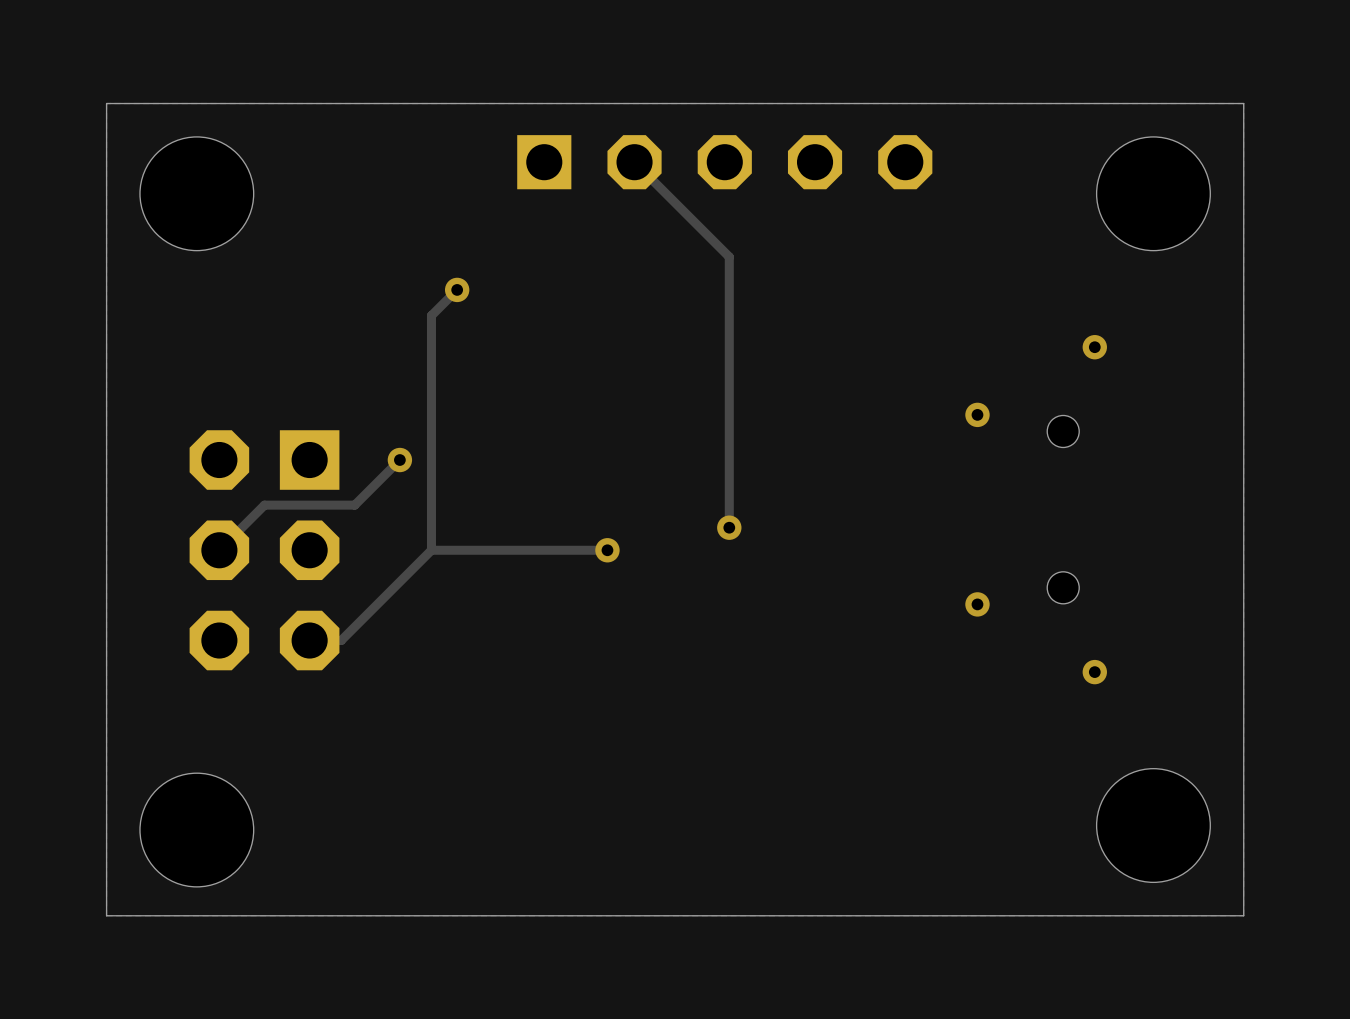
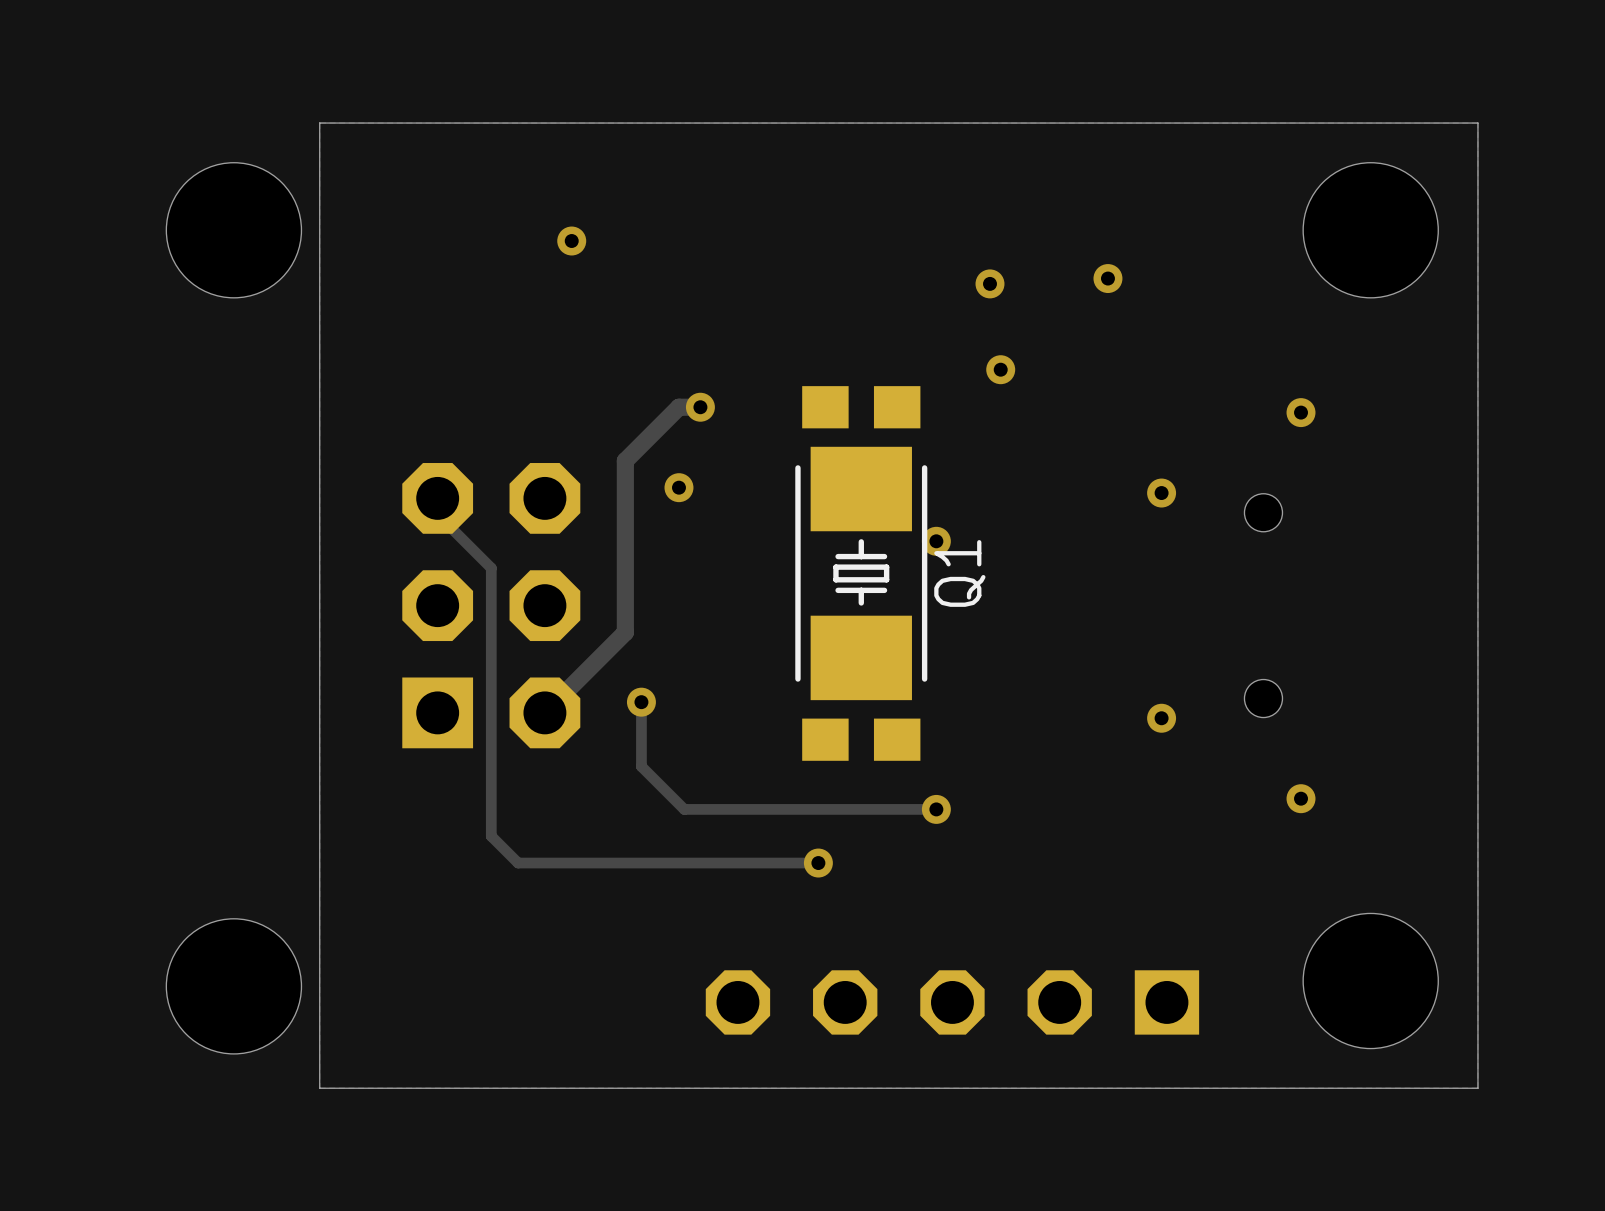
board edge: (269, 103) (106, 103) (106, 915) (269, 915) -> (319, 123) (319, 1088)
track: (634, 162) (729, 256) (729, 527) -> none
part rotation: 0° (724, 162) -> 180° (952, 1002)
part position: (724, 162) -> (952, 1002)
via: none -> (571, 241)
via: none -> (1107, 278)
via: none -> (989, 283)
track: (457, 289) (431, 315) (431, 550) -> none
via: (457, 289) -> none
via: none -> (1000, 369)
track: none -> (700, 407) (678, 407) (625, 460) (625, 632) (544, 712)
via: none -> (700, 407)
part: none -> (861, 407)
via: none -> (678, 487)
track: none -> (437, 498) (437, 514) (491, 568) (491, 836) (518, 863) (818, 863)
via: none -> (936, 541)
track: (399, 460) (354, 505) (264, 505) (219, 550) -> none
via: (399, 460) -> none
Q1: none -> (861, 573)
via: (729, 527) -> none
part rotation: 0° (264, 550) -> 180° (491, 605)
part position: (264, 550) -> (491, 605)
track: (431, 550) (341, 640) (309, 640) -> none
track: (607, 550) (431, 550) -> none
via: (607, 550) -> none
track: none -> (641, 702) (641, 766) (684, 809) (936, 809)
via: none -> (641, 702)
part: none -> (861, 739)
via: none -> (936, 809)
via: none -> (818, 863)

